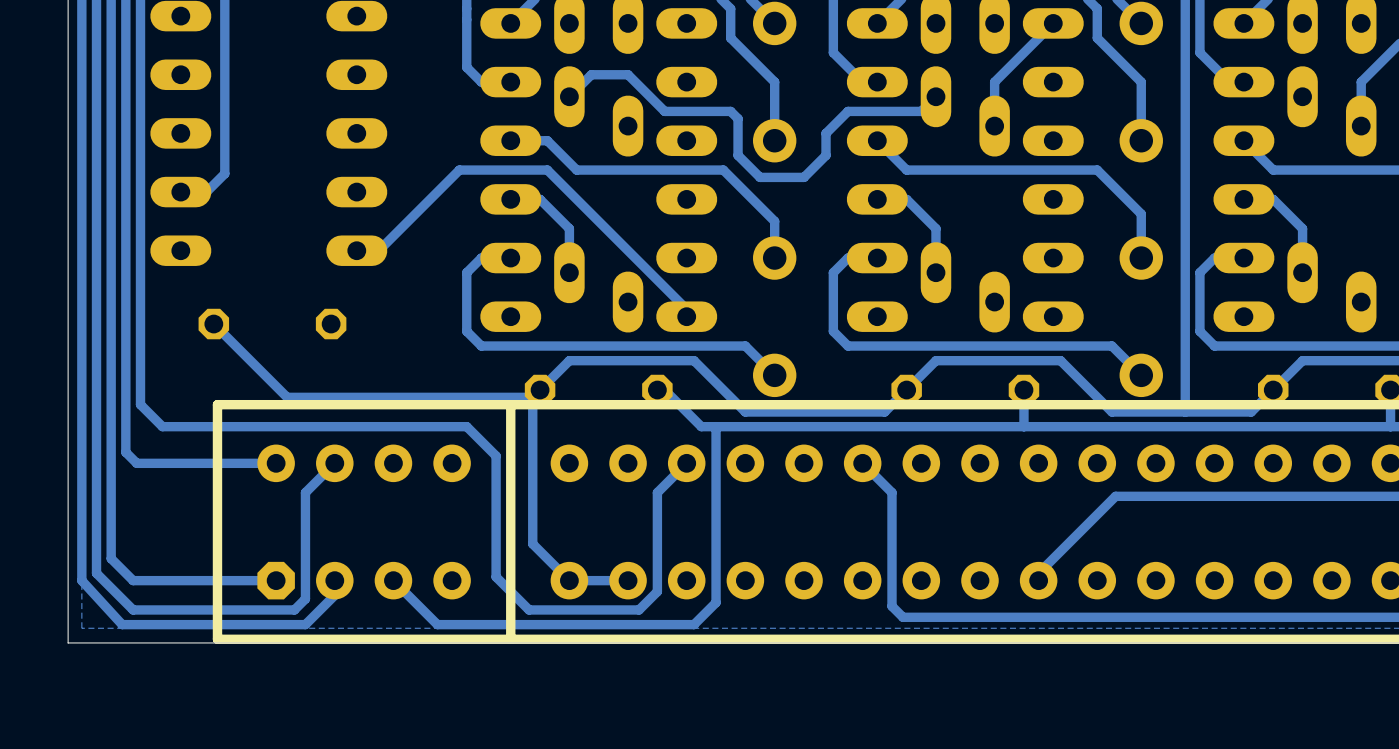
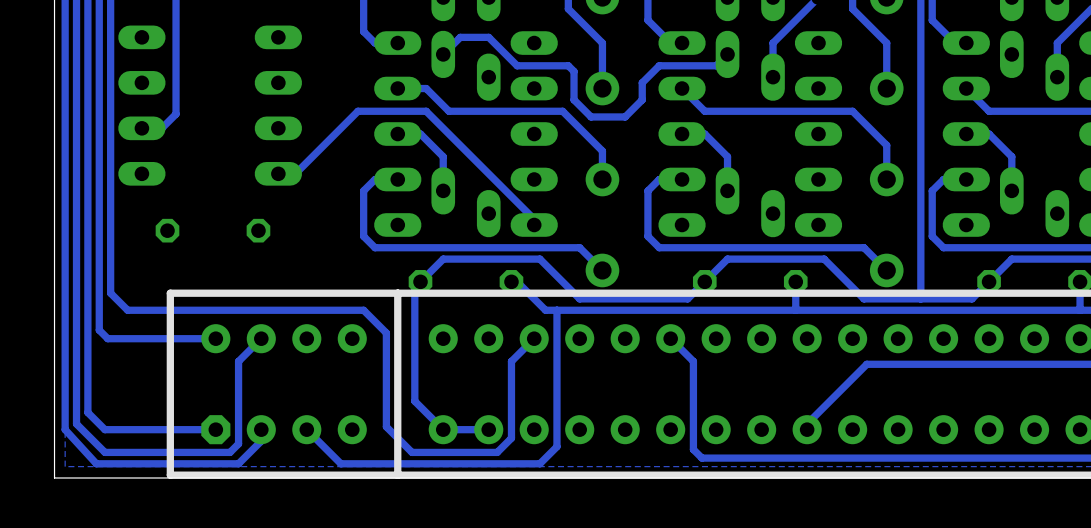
track: (213, 324) (287, 397) (532, 397) -> none

